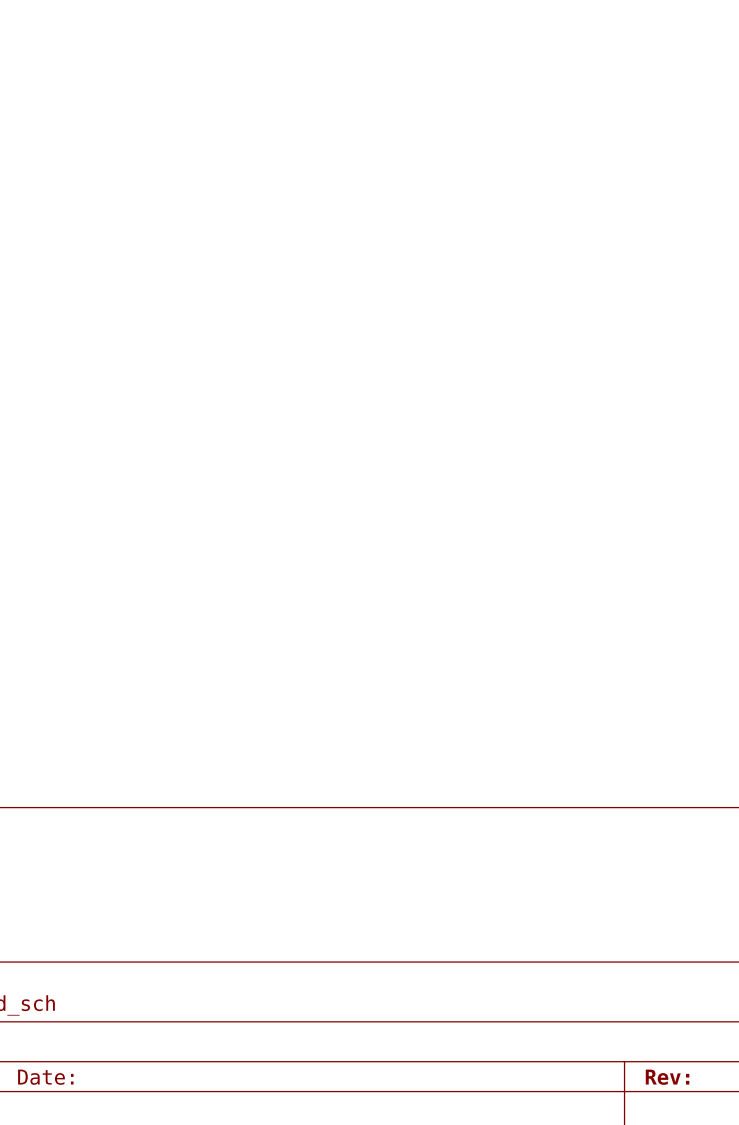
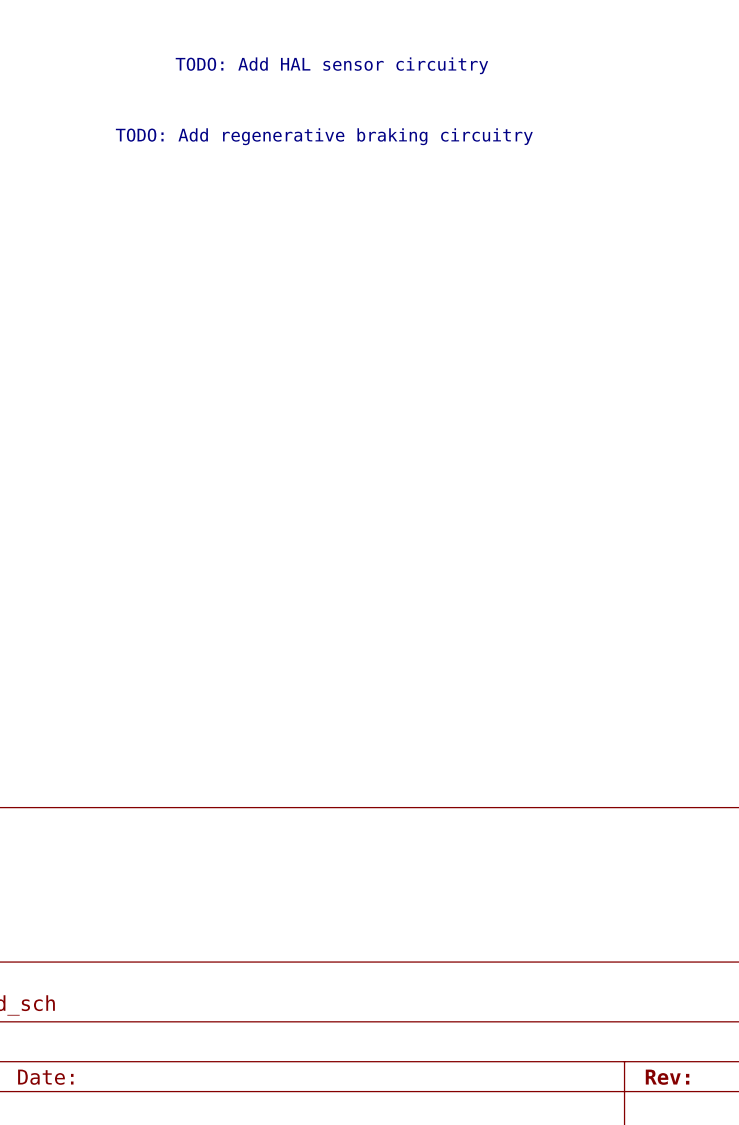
text: none -> TODO: Add HAL sensor circuitry (331, 65)
text: none -> TODO: Add regenerative braking circuitry (324, 136)

